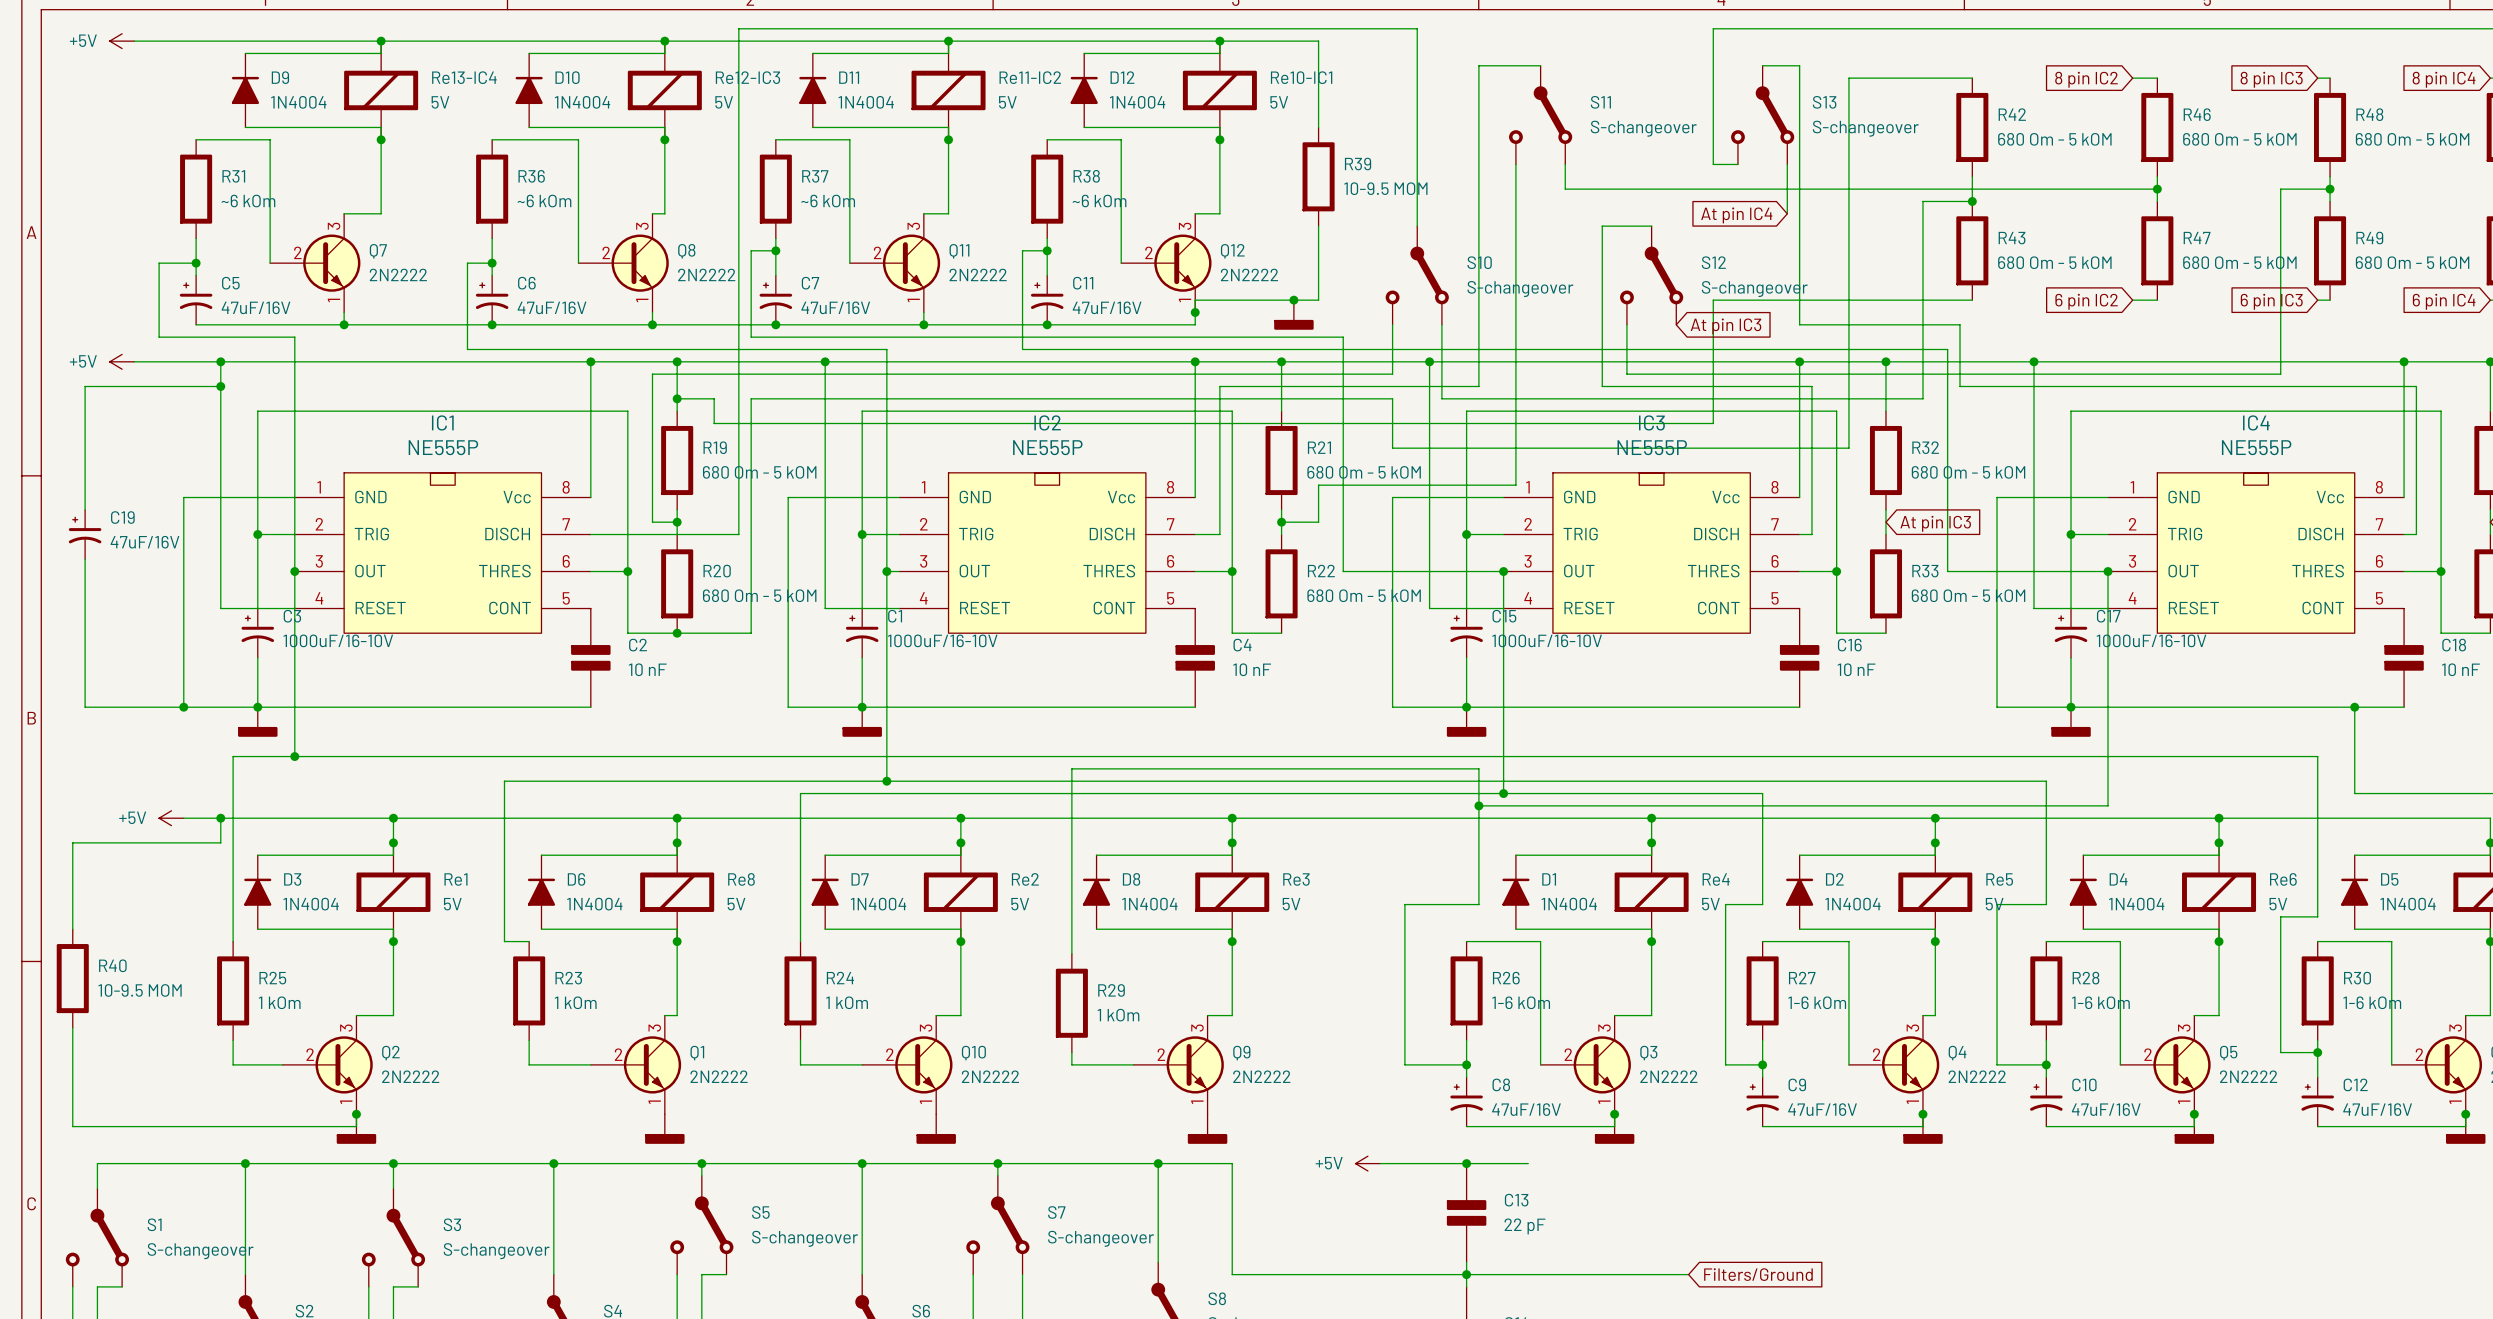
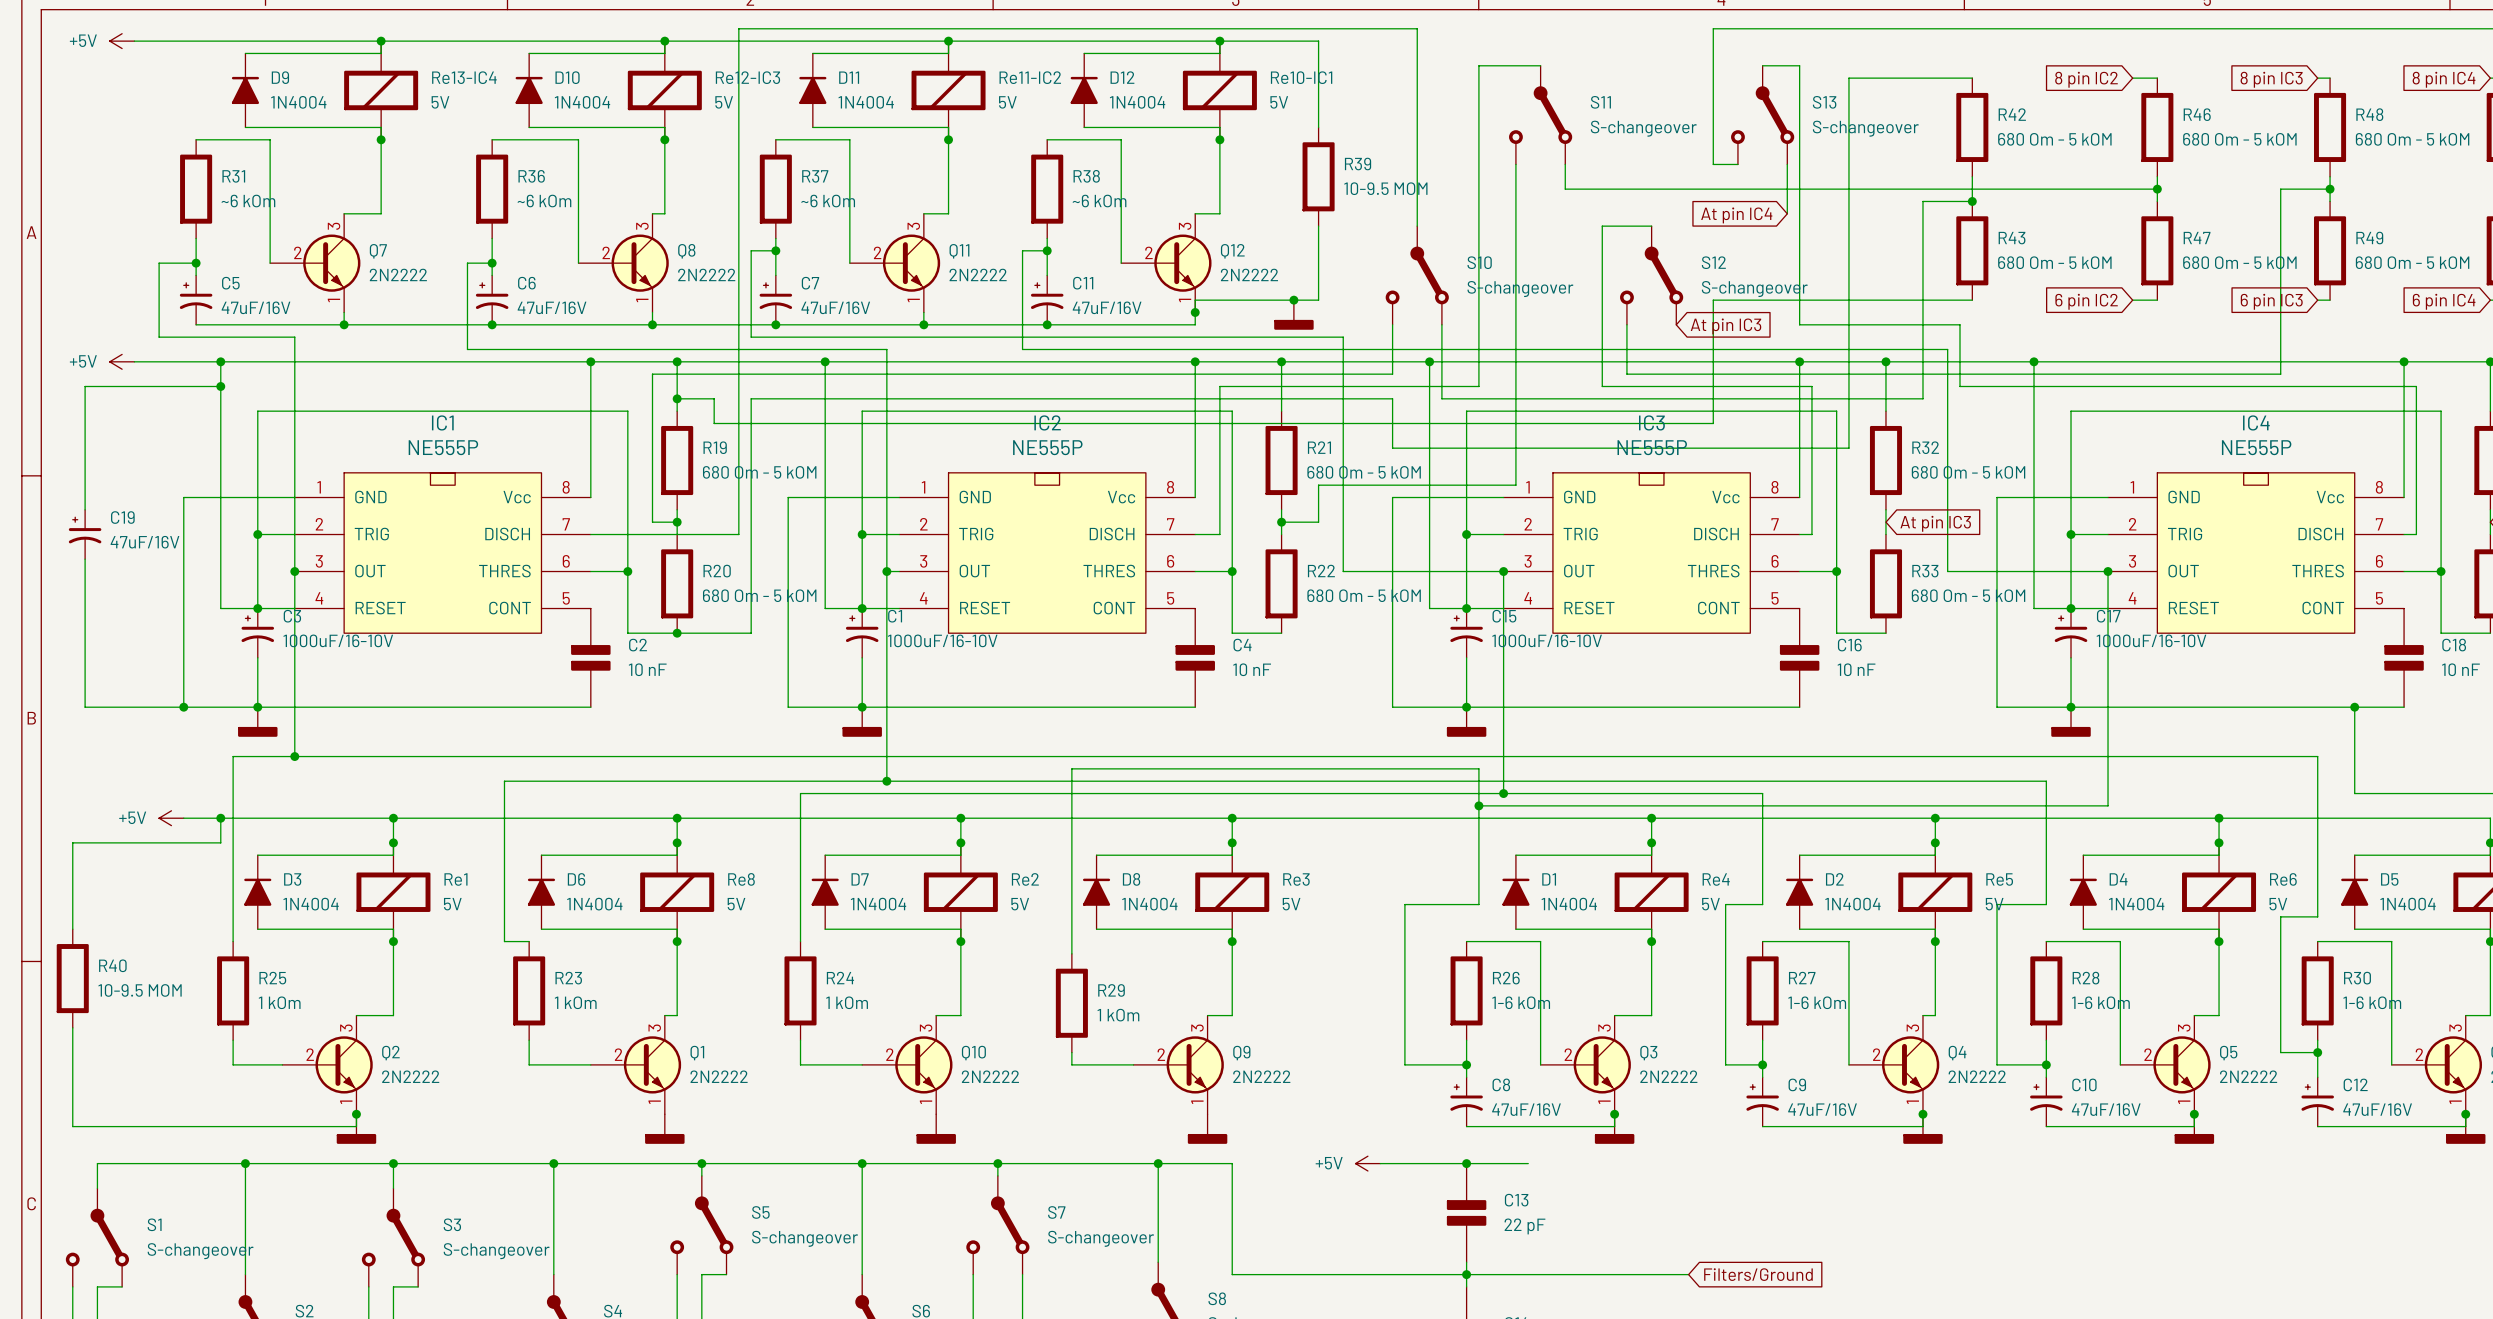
junction: none -> (257, 608)
junction: none -> (862, 608)
junction: none -> (1466, 608)
junction: none -> (2071, 608)

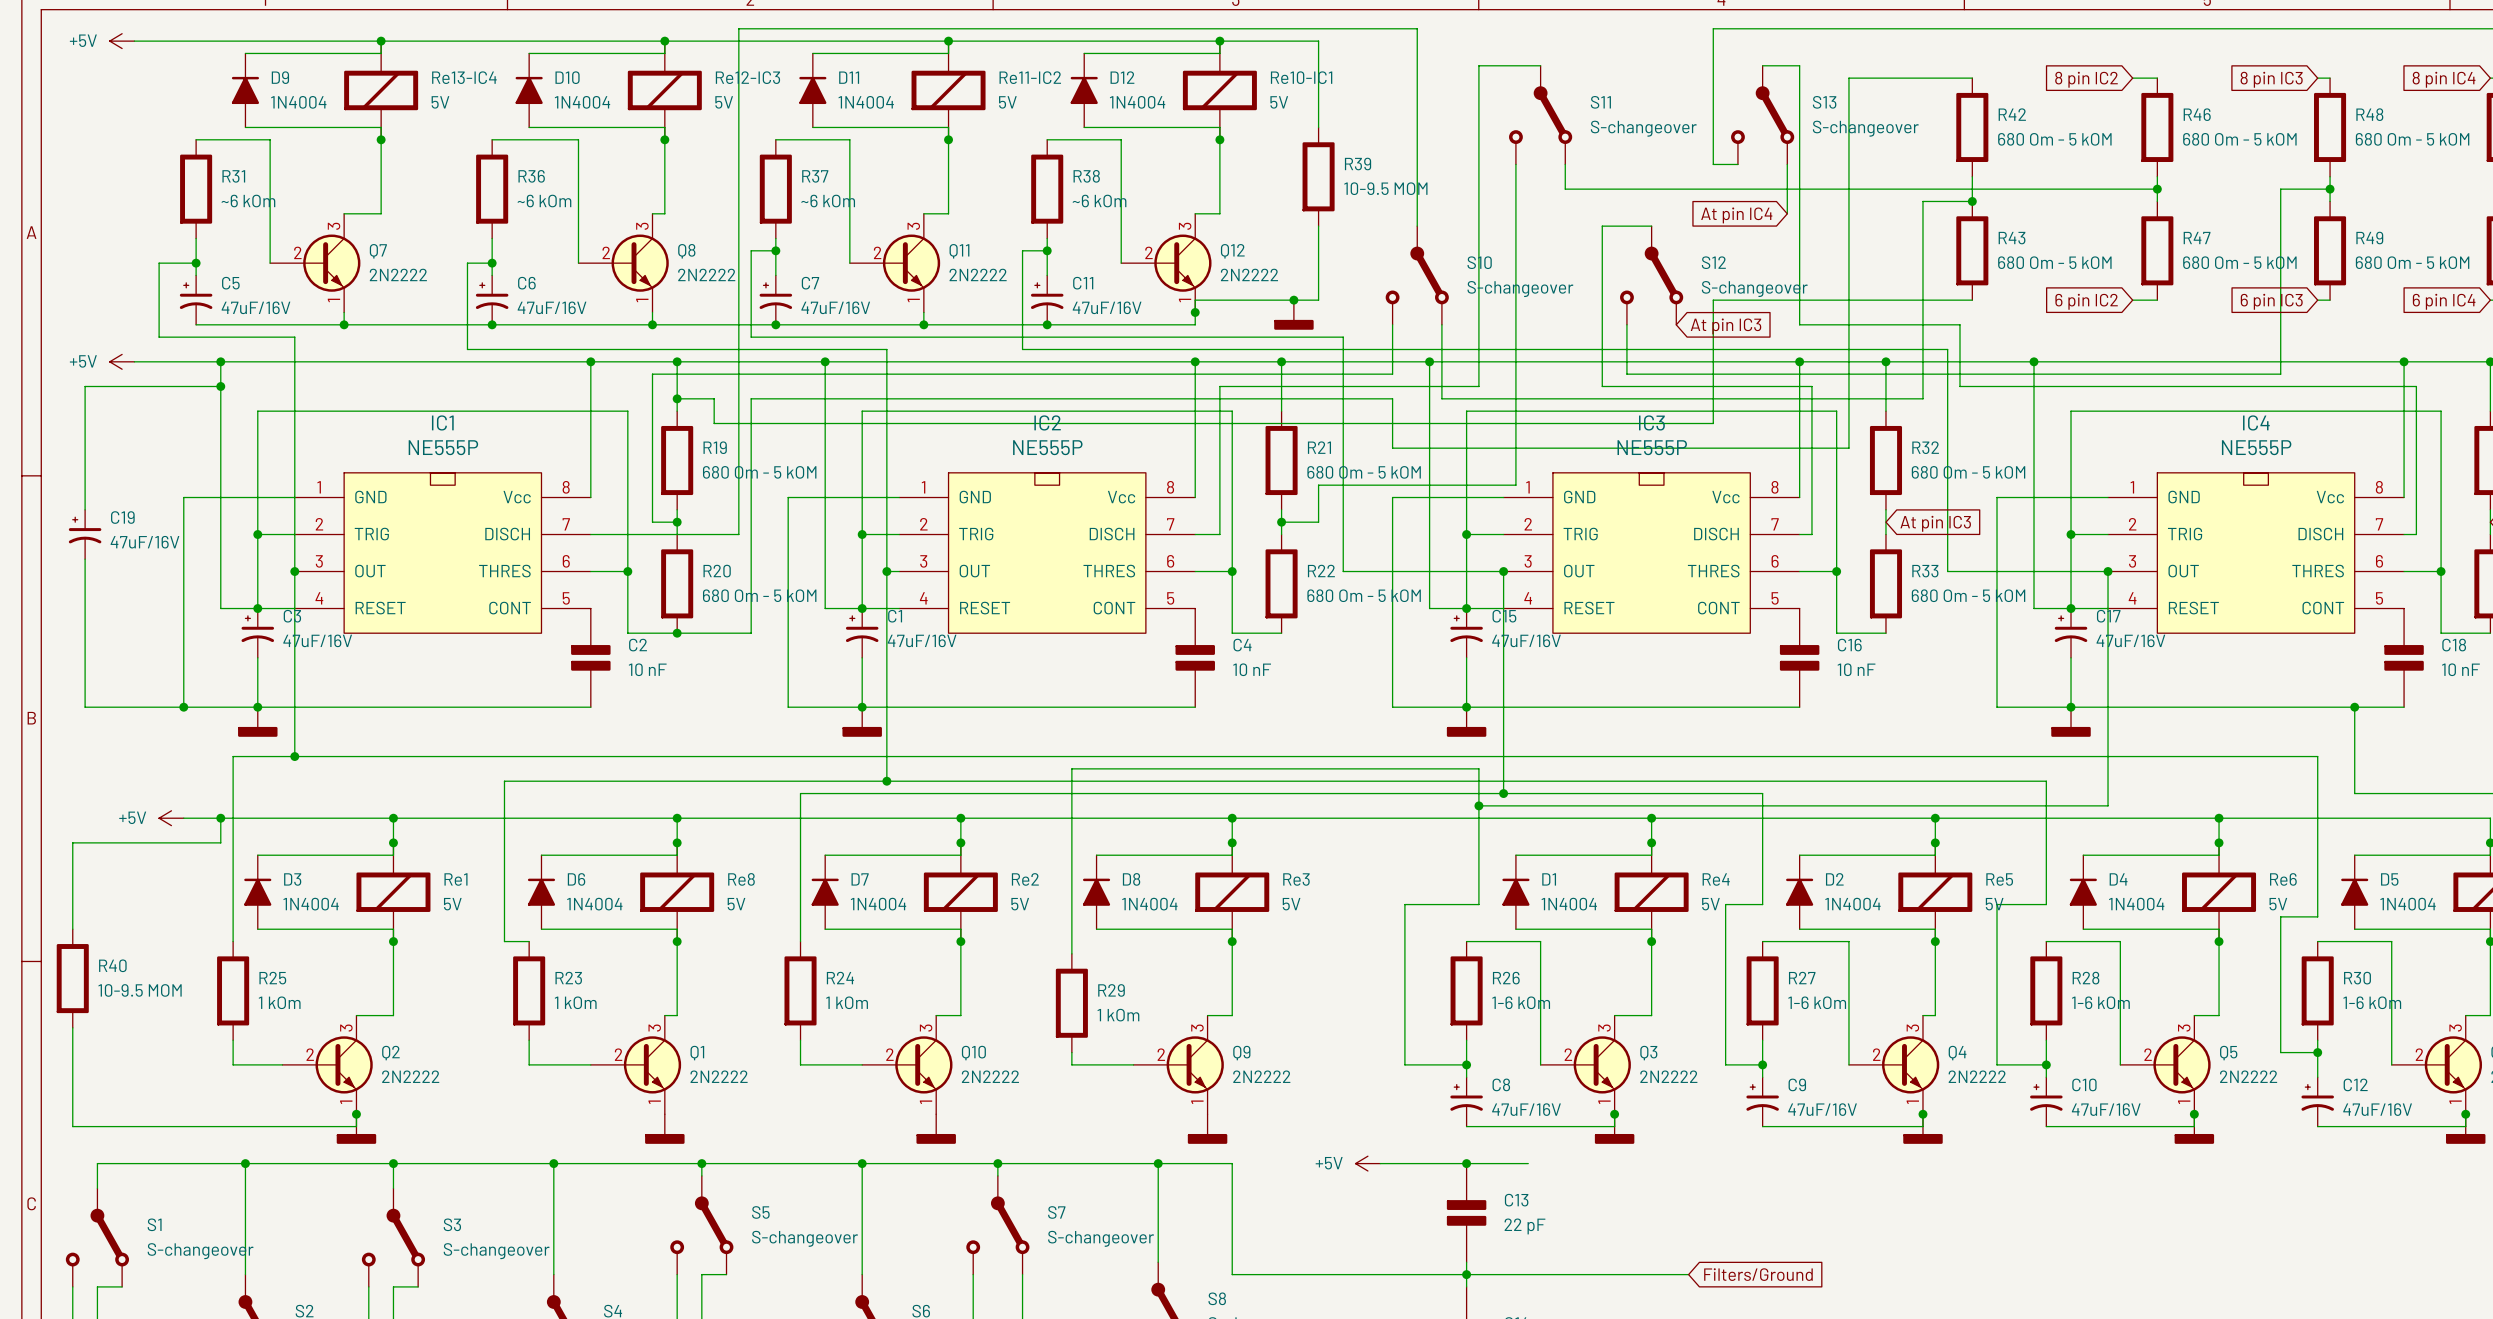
C3 text: 1000uF/16-10V (338, 640) -> 47uF/16V (317, 640)
C1 text: 1000uF/16-10V (942, 640) -> 47uF/16V (922, 640)
C15 text: 1000uF/16-10V (1547, 640) -> 47uF/16V (1526, 640)
C17 text: 1000uF/16-10V (2151, 640) -> 47uF/16V (2130, 640)

